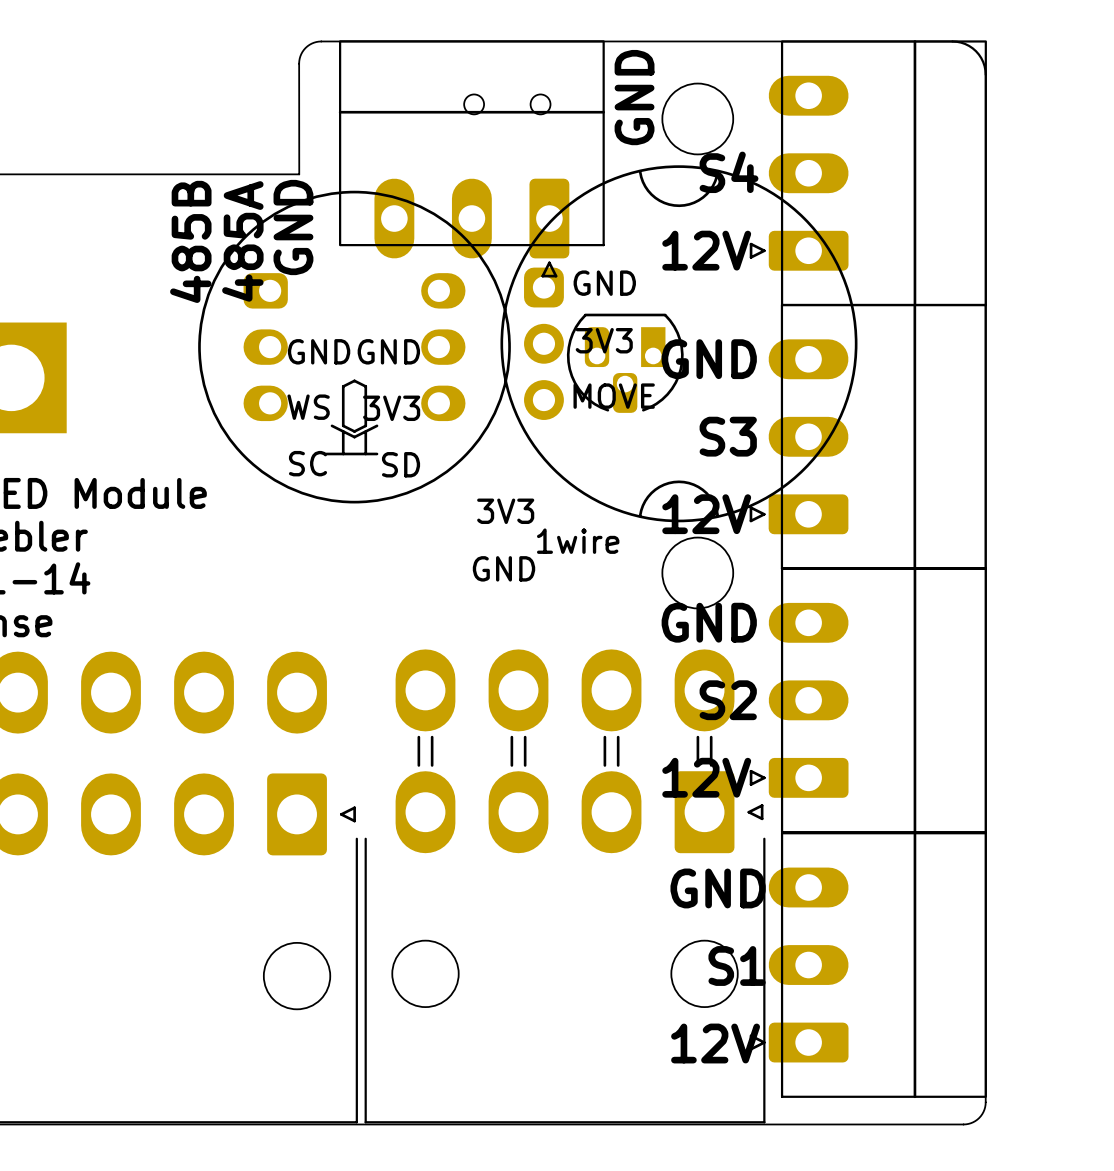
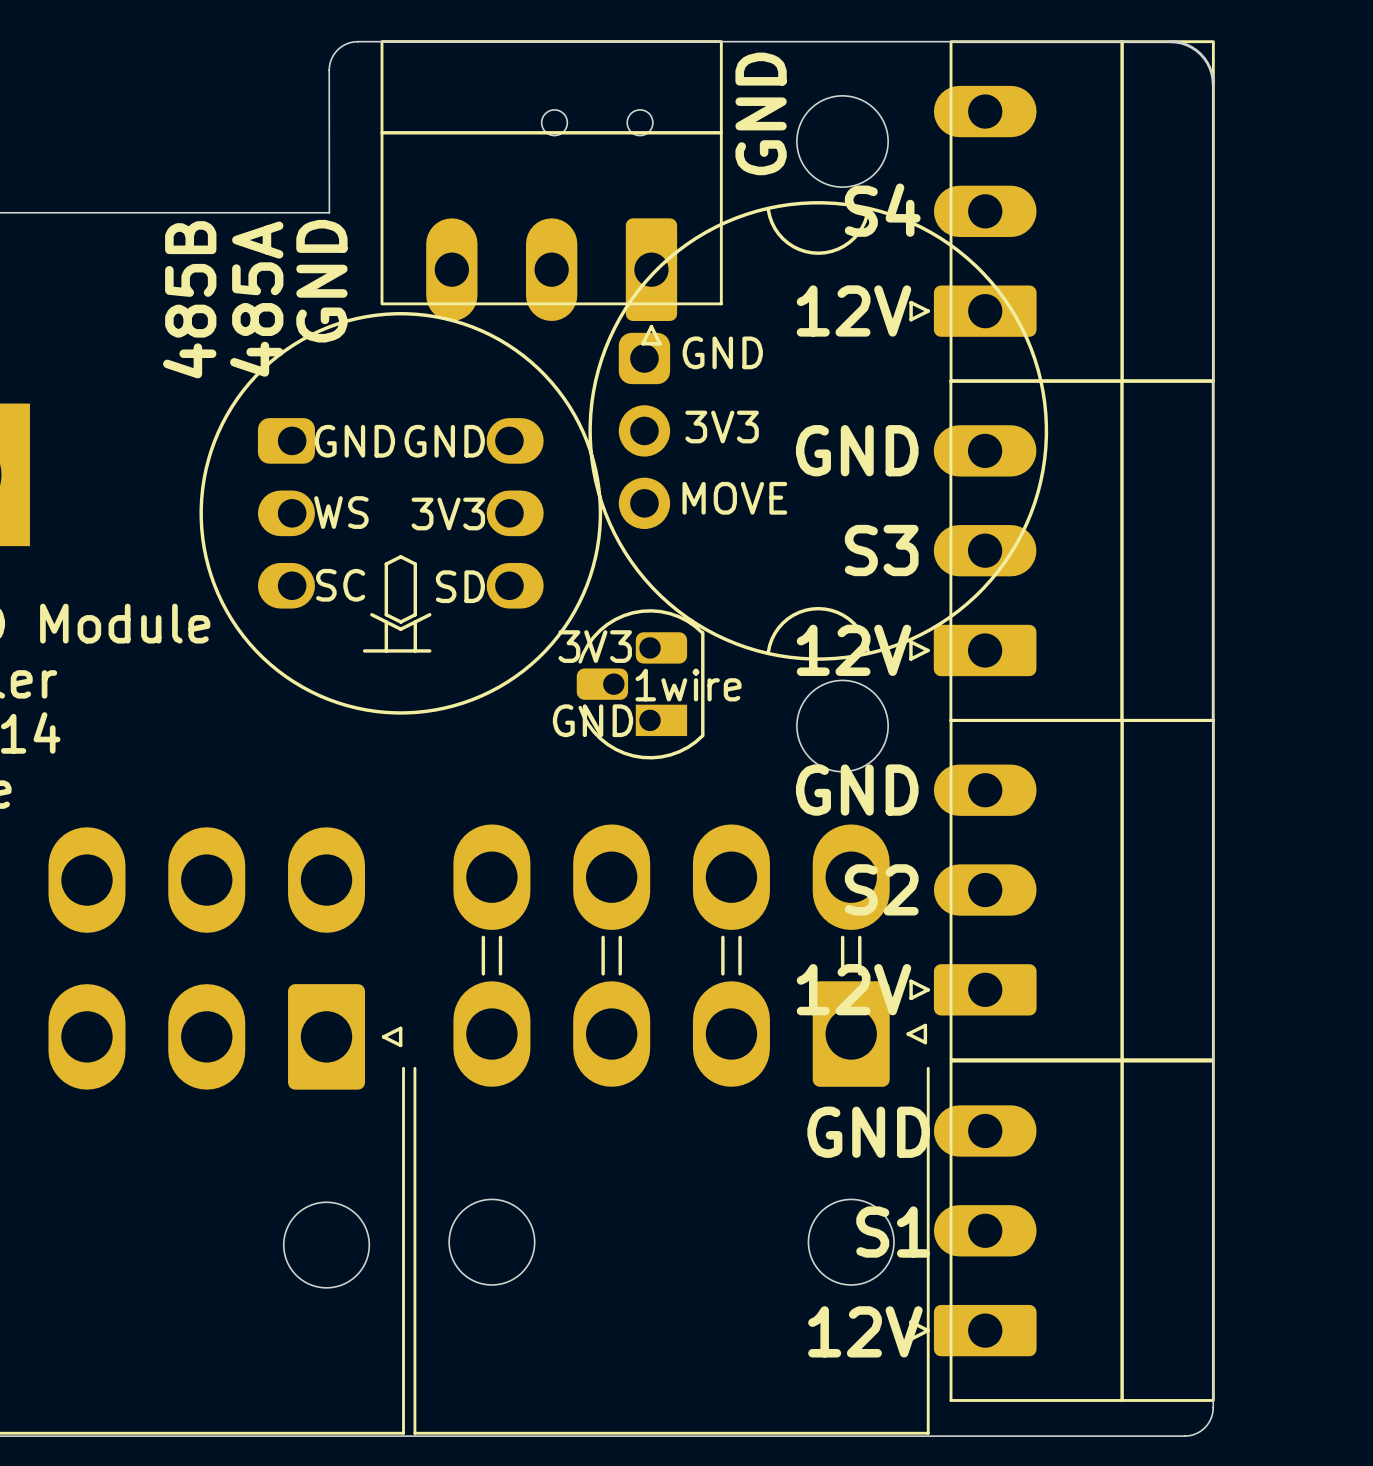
part position: (354, 347) -> (400, 513)
part rotation: 0° (625, 363) -> 90° clockwise (640, 684)
part position: (625, 363) -> (640, 684)

